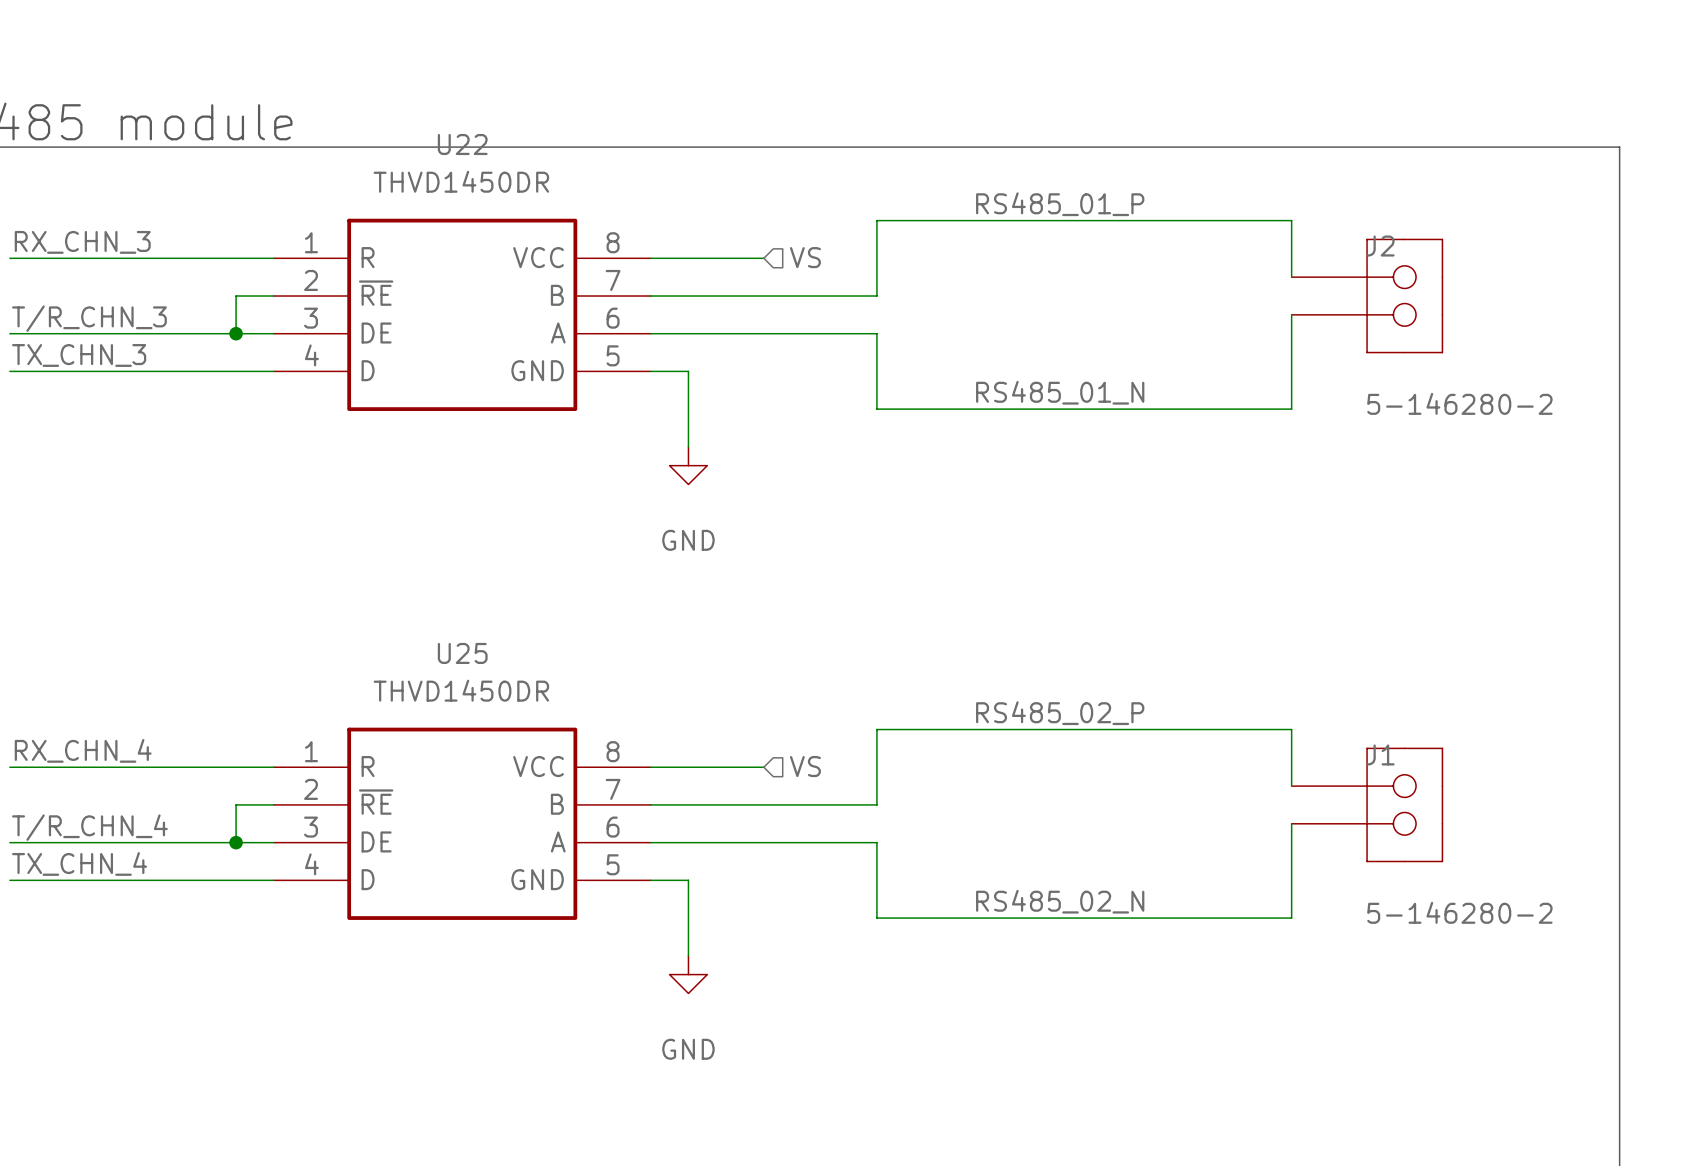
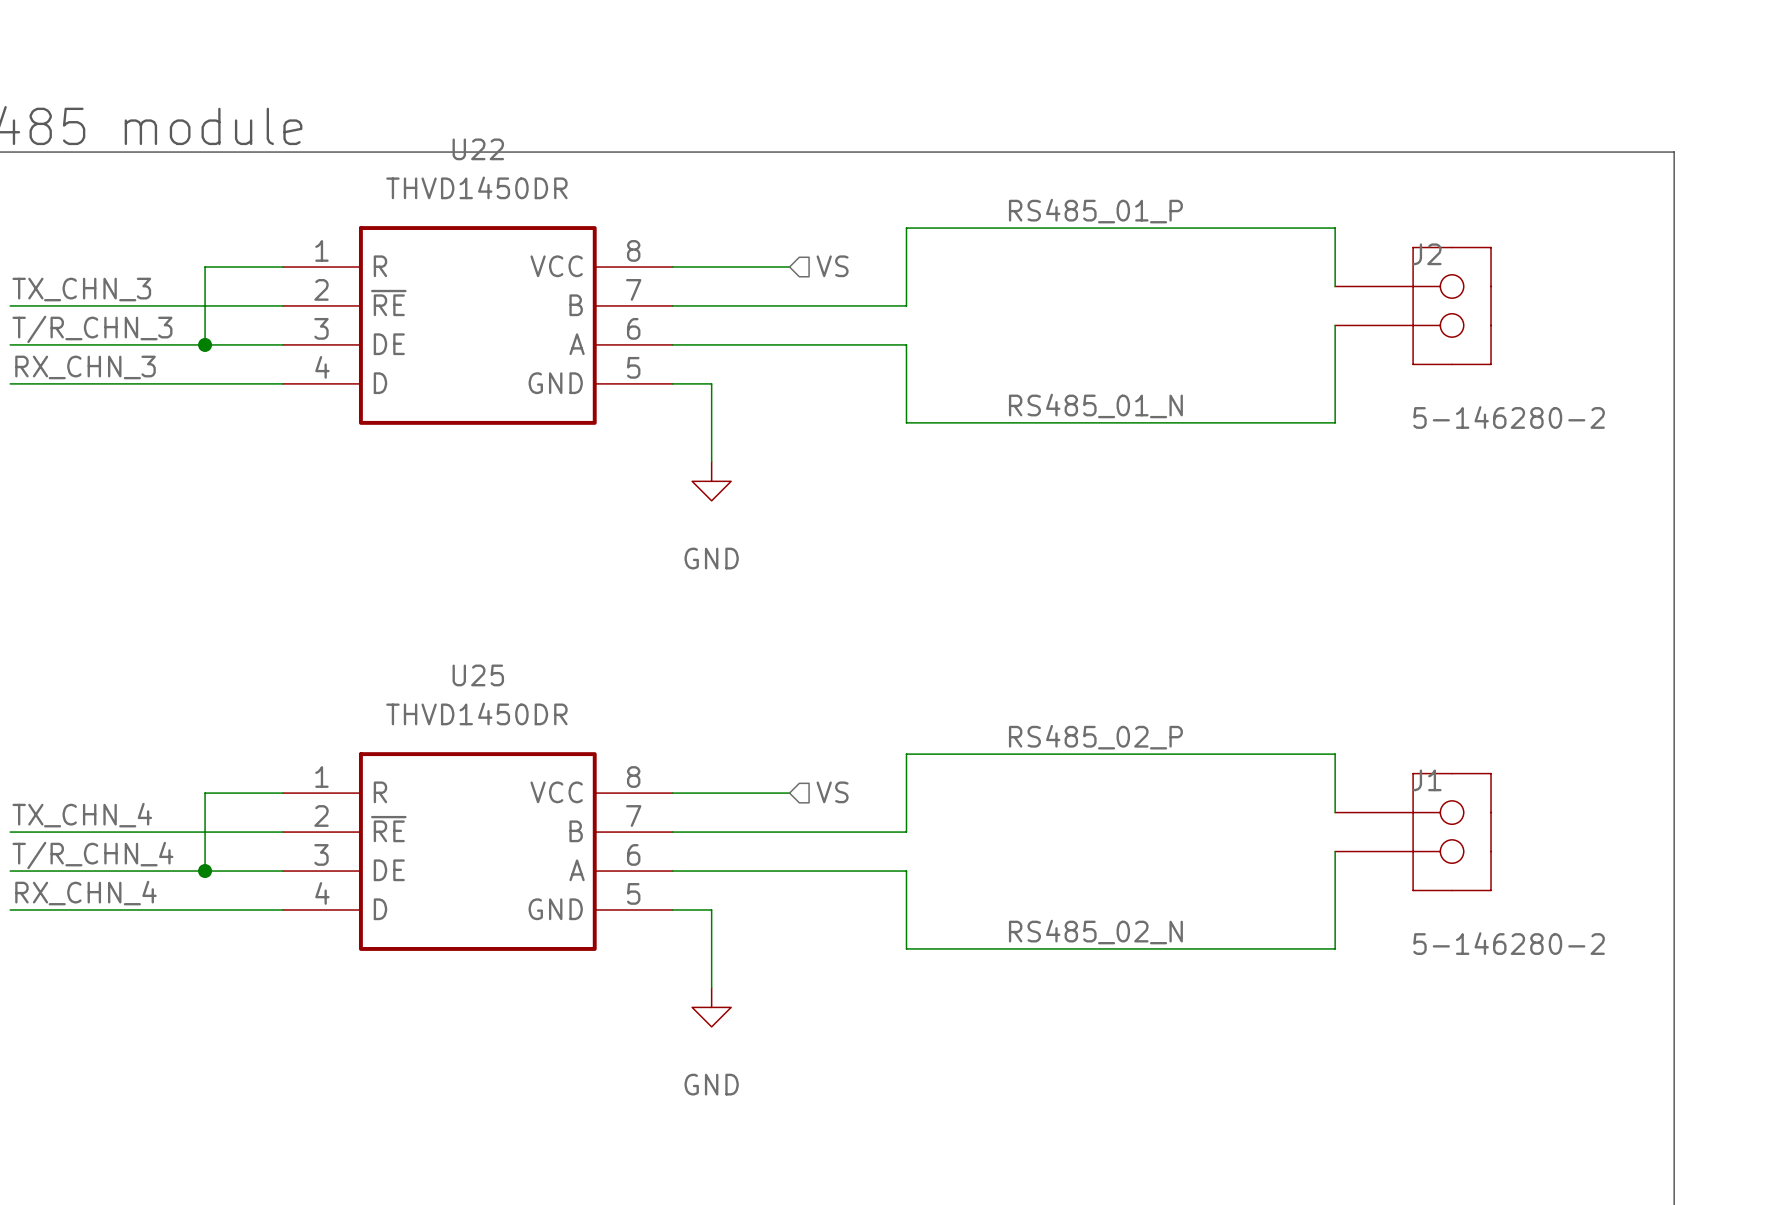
label: RX_CHN_3 (82, 242) -> TX_CHN_3 (81, 289)
wire: (9, 258) (198, 258) -> (205, 344) (205, 267)
wire: (236, 296) (236, 333) -> (244, 305) (10, 305)
junction position: (236, 333) -> (205, 344)
label: TX_CHN_3 (79, 355) -> RX_CHN_3 (85, 367)
label: RX_CHN_4 (83, 750) -> TX_CHN_4 (82, 815)
wire: (9, 767) (198, 767) -> (205, 871) (205, 793)
wire: (236, 804) (236, 842) -> (244, 832) (10, 832)
junction position: (236, 842) -> (205, 871)
label: TX_CHN_4 (79, 863) -> RX_CHN_4 (85, 893)

